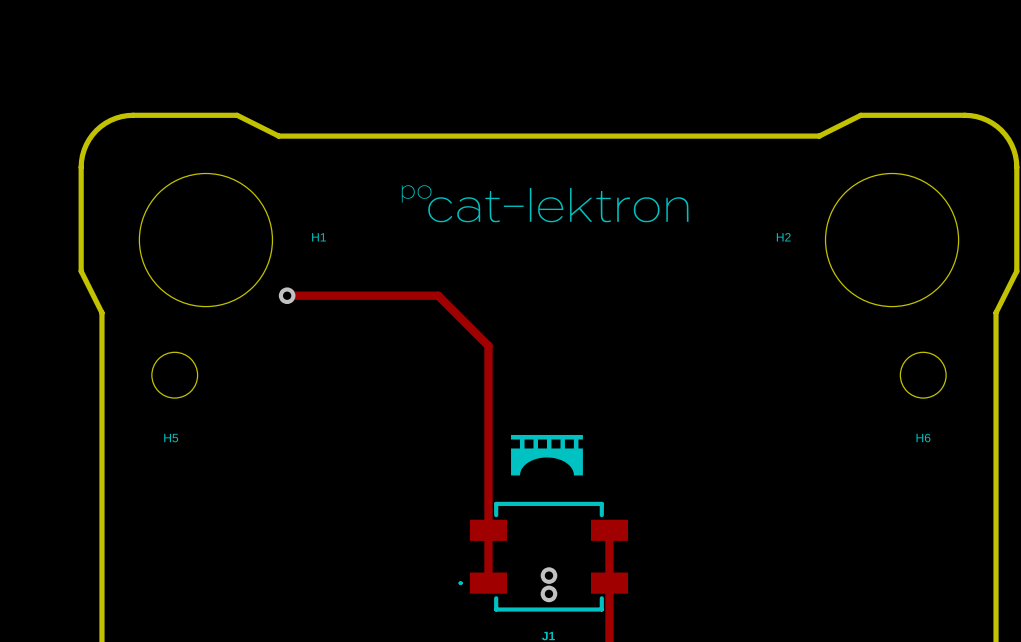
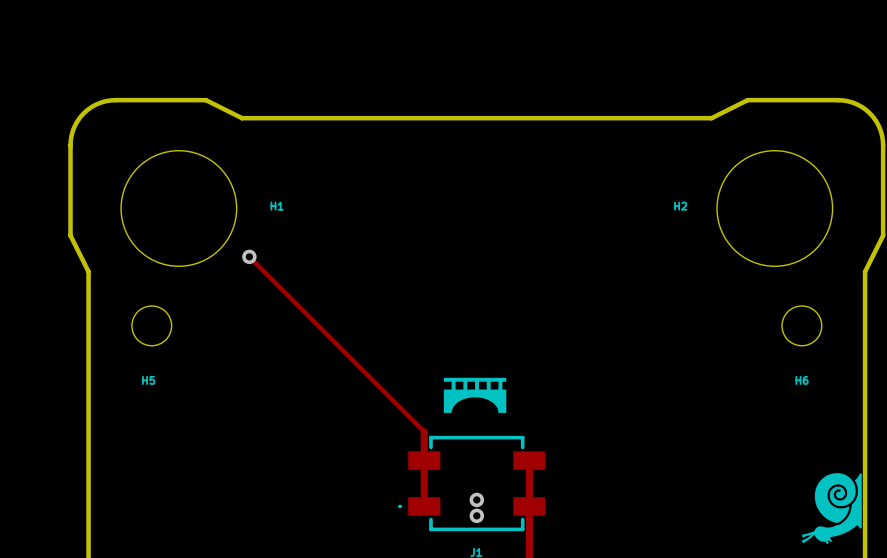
drawing: [401, 185, 689, 223] -> none
top track: (287, 295) (438, 295) (488, 346) (488, 497) -> (249, 256) (424, 431)
drawing: none -> [802, 473, 862, 545]

